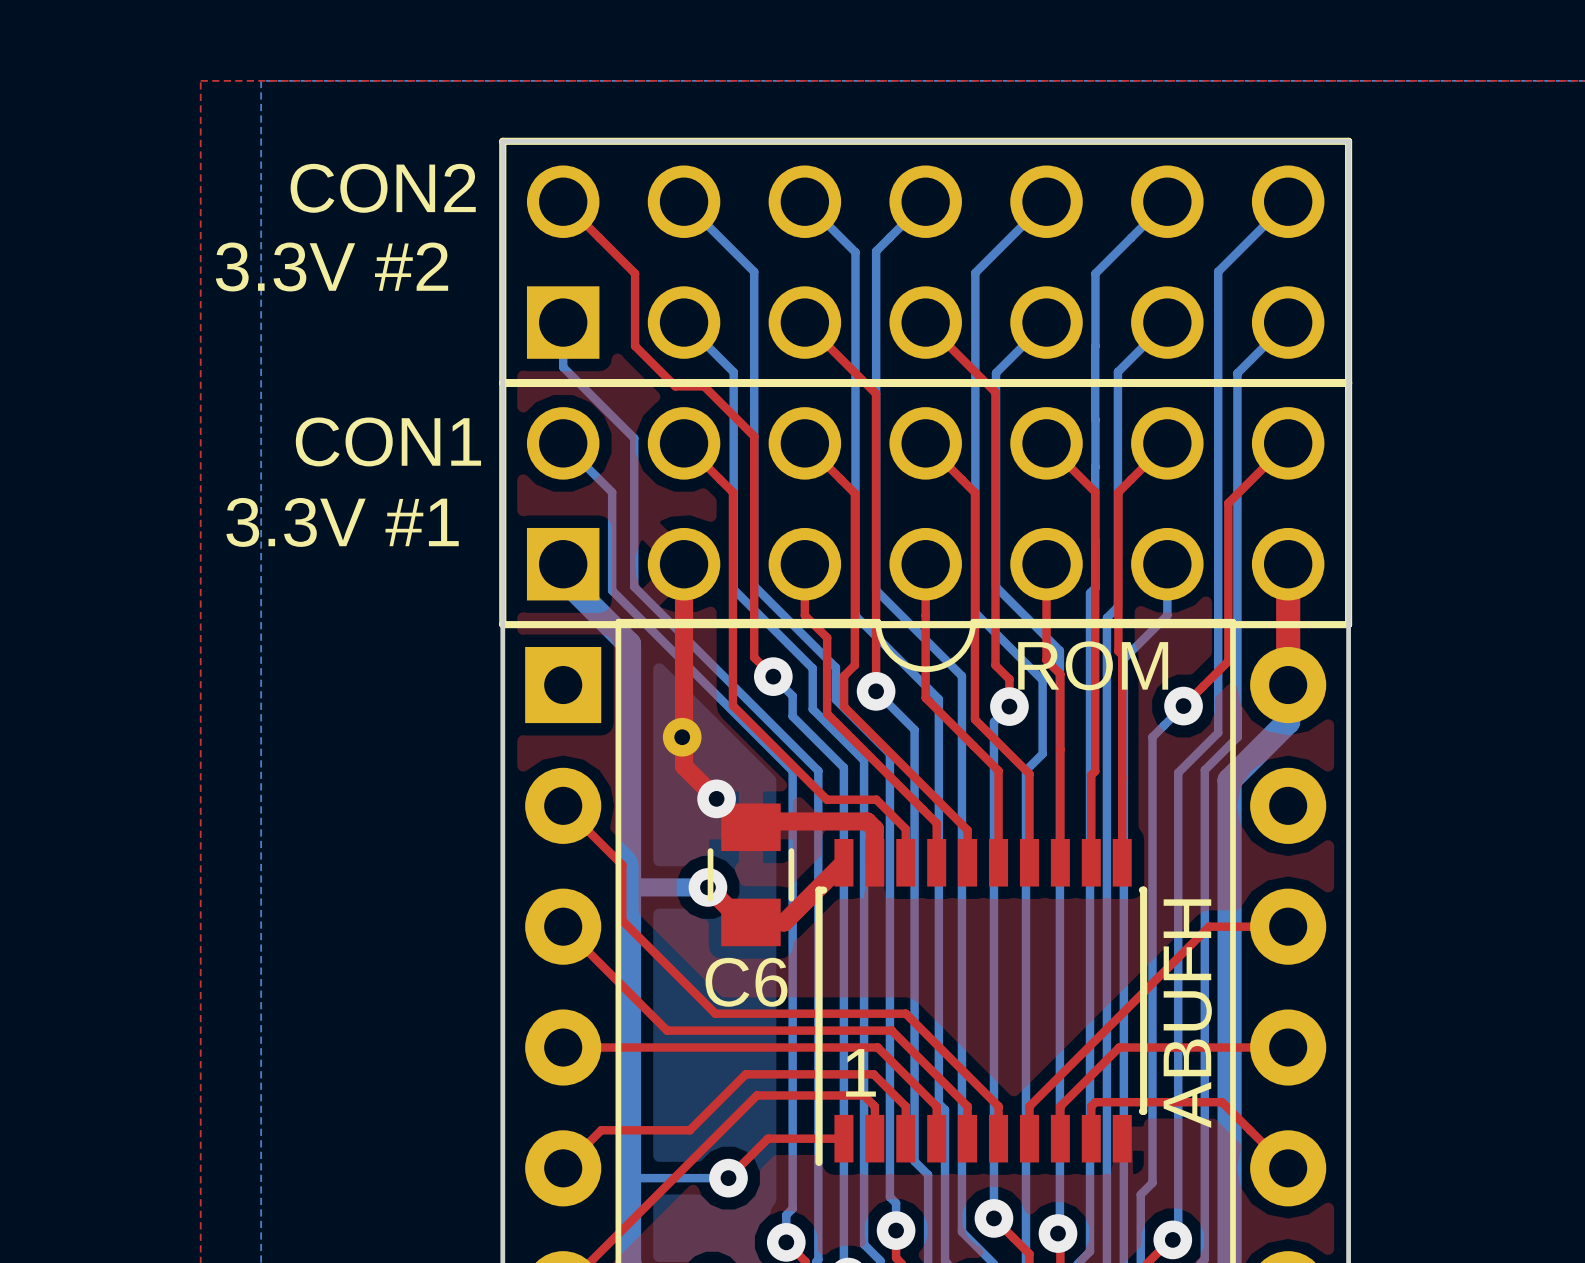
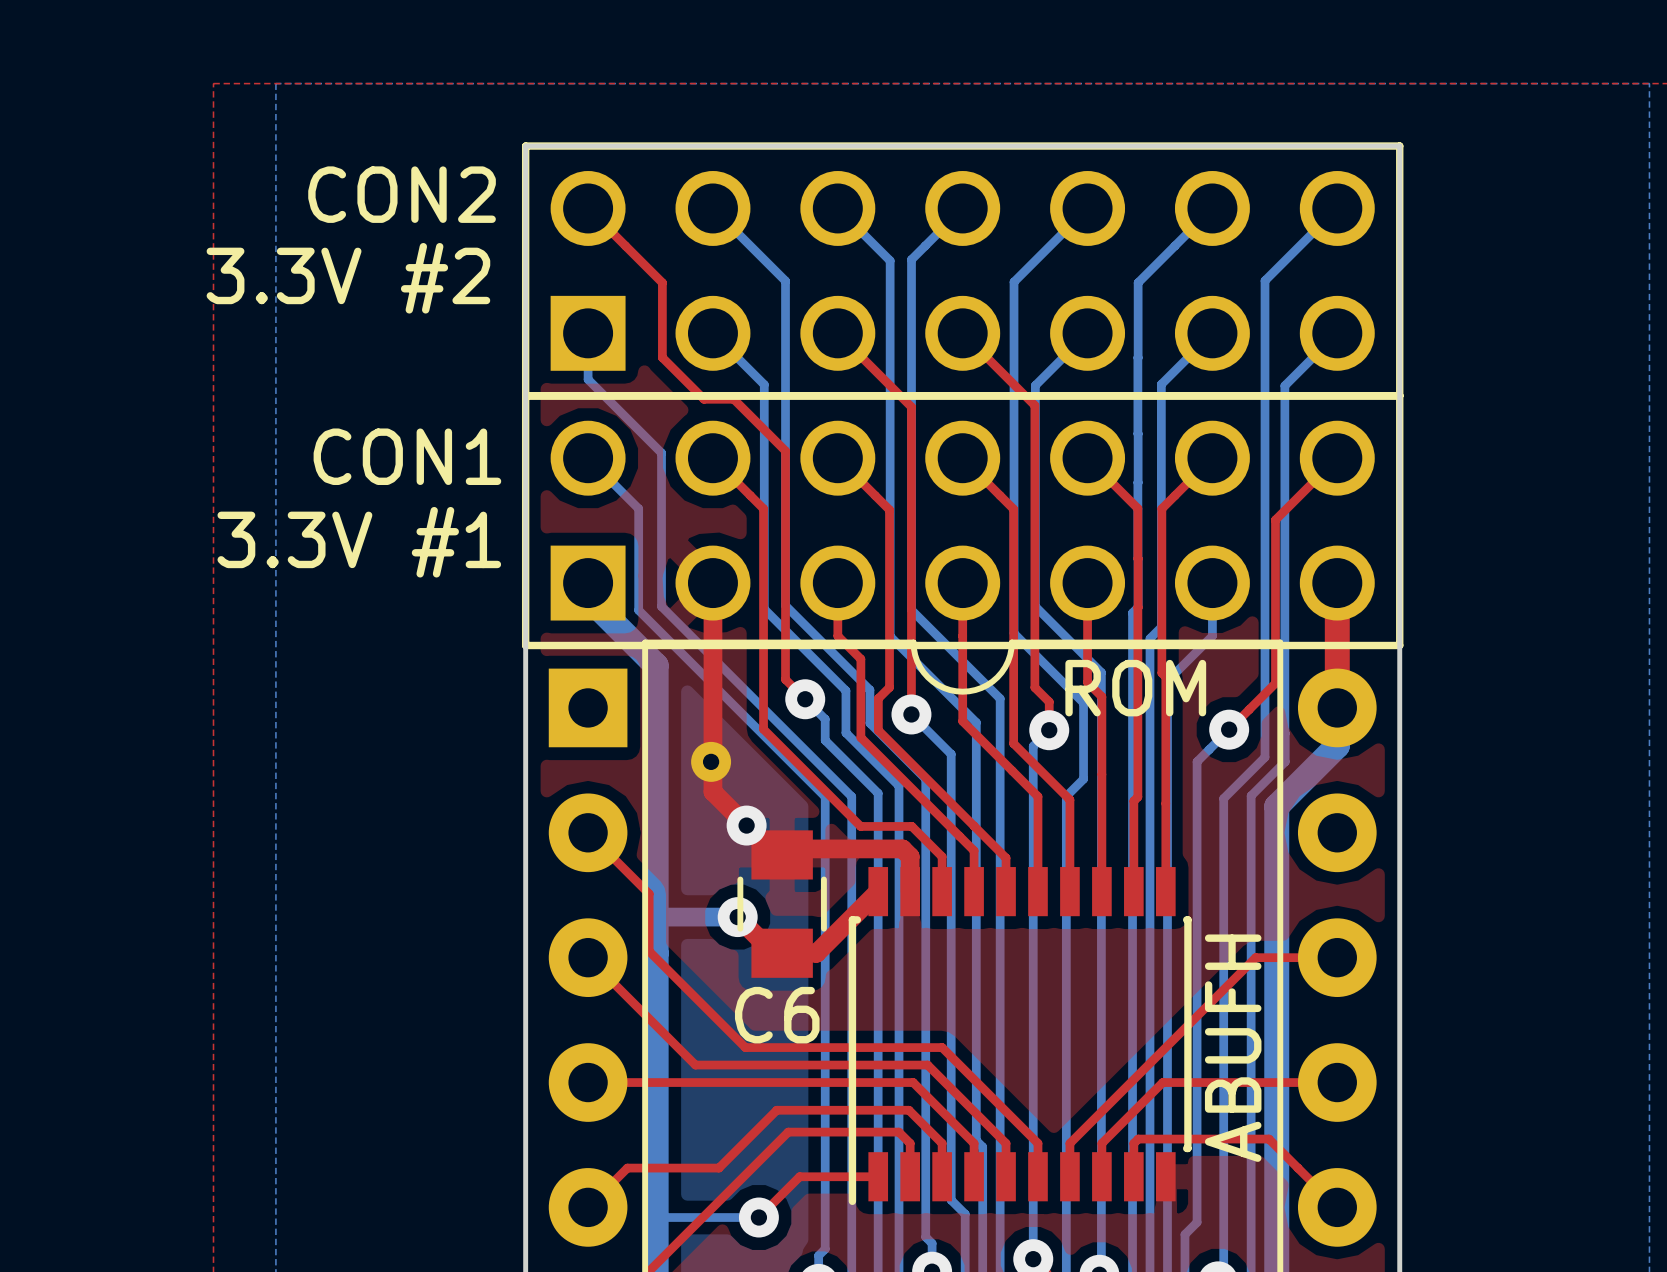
text: 1 (860, 1072) -> none

